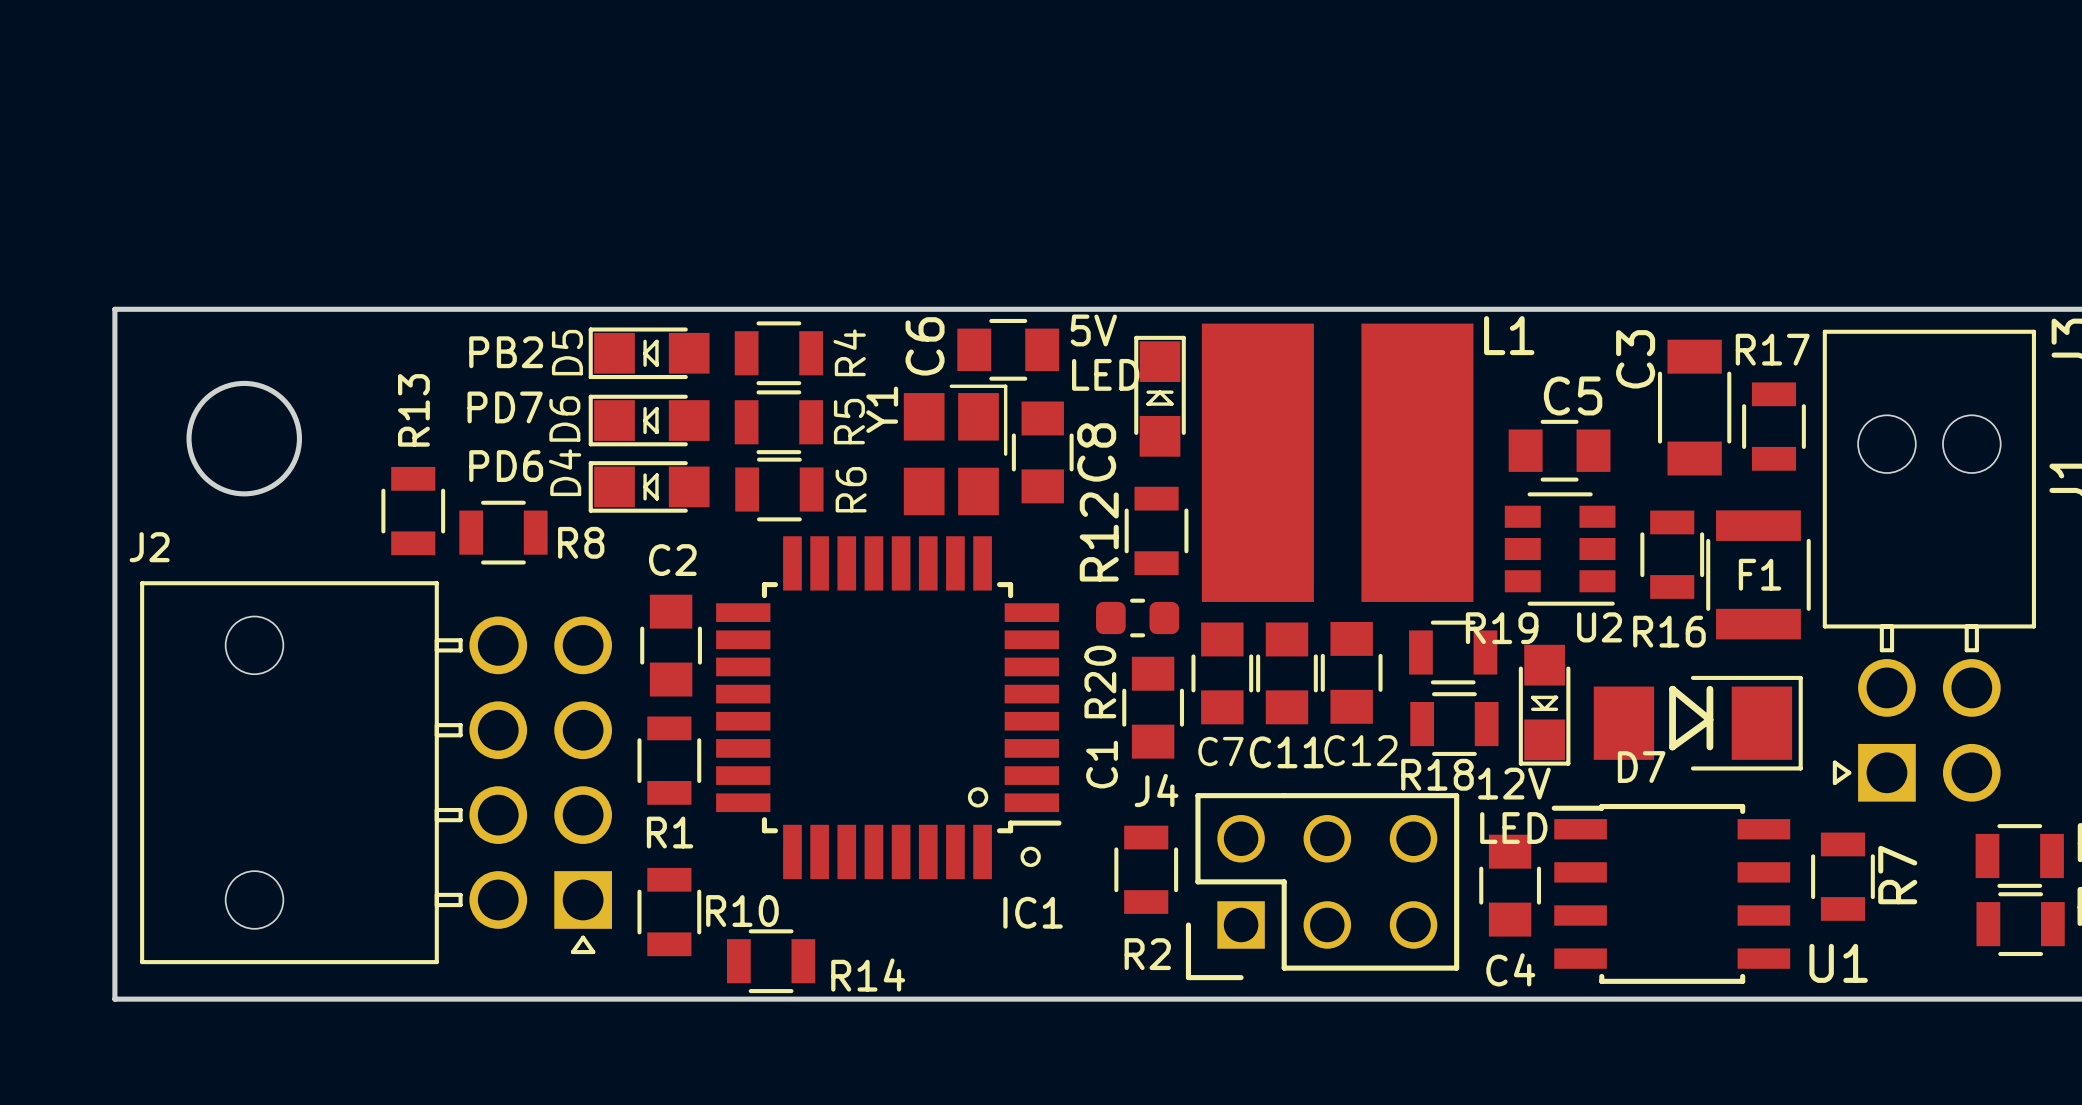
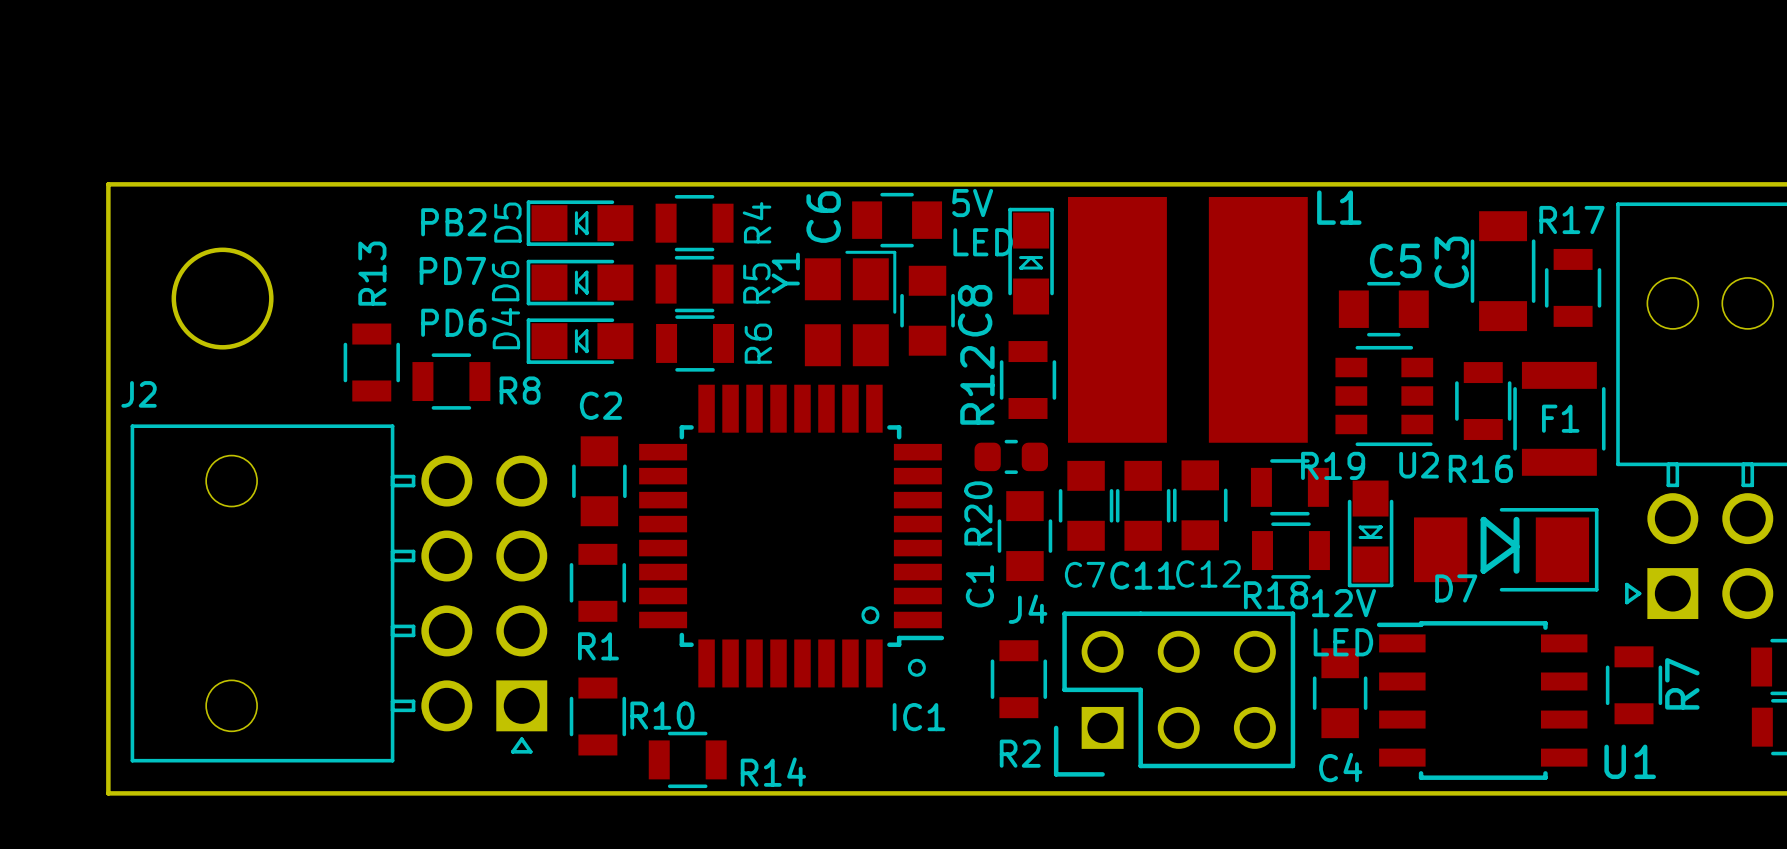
C3 name position: C3 (1635, 359) -> C3 (1451, 262)

